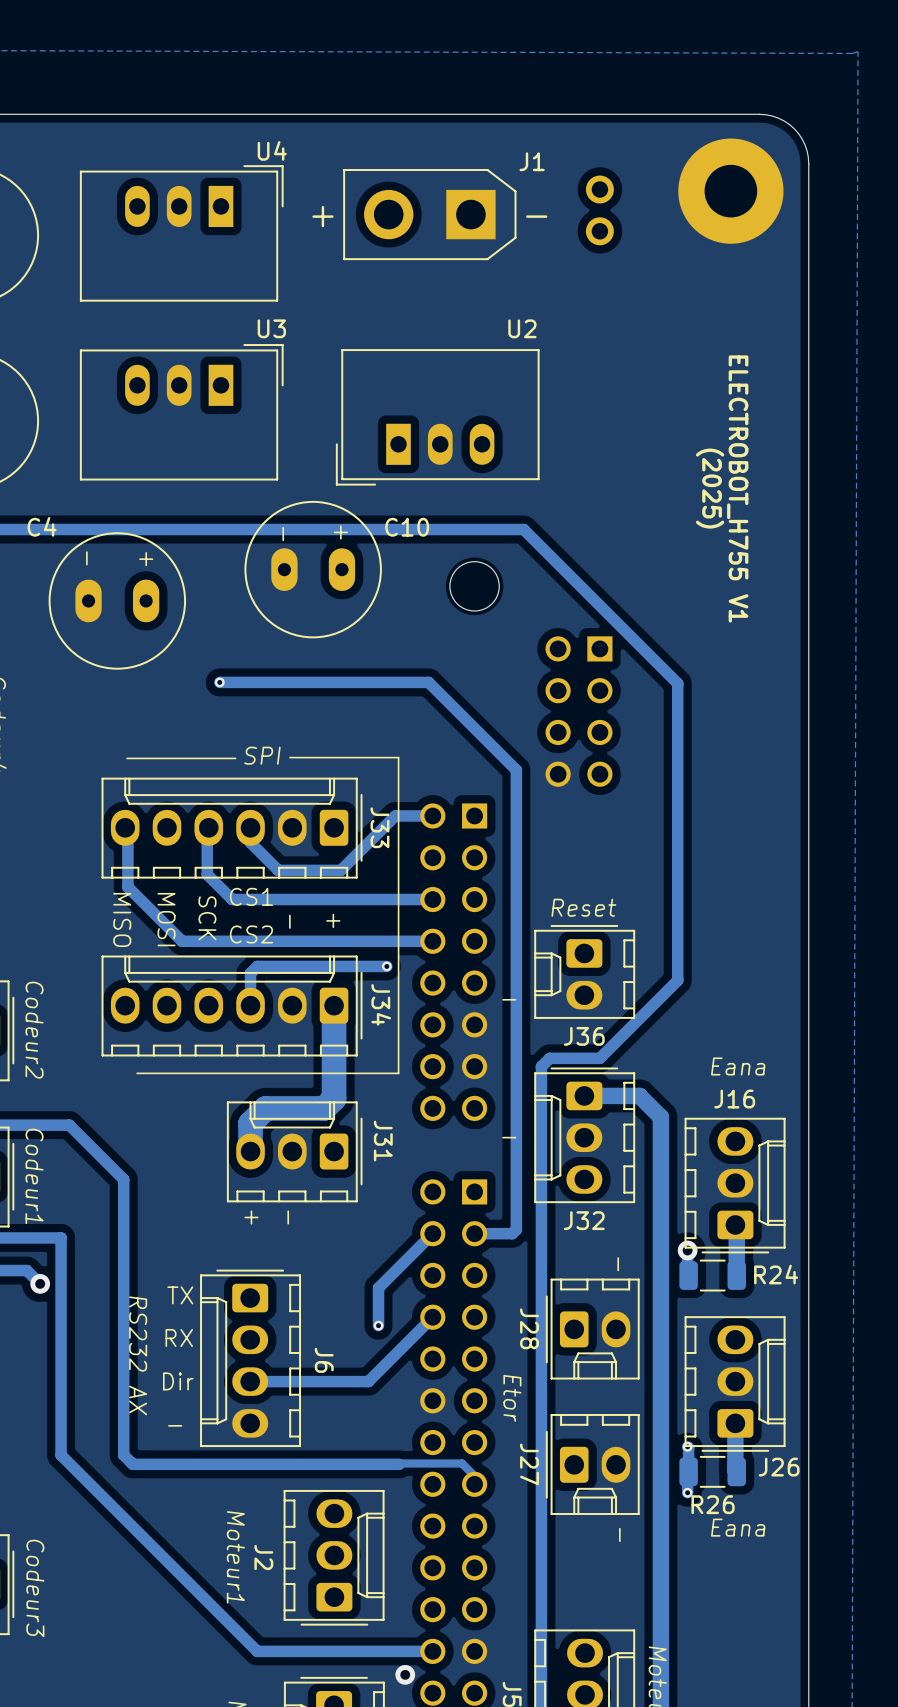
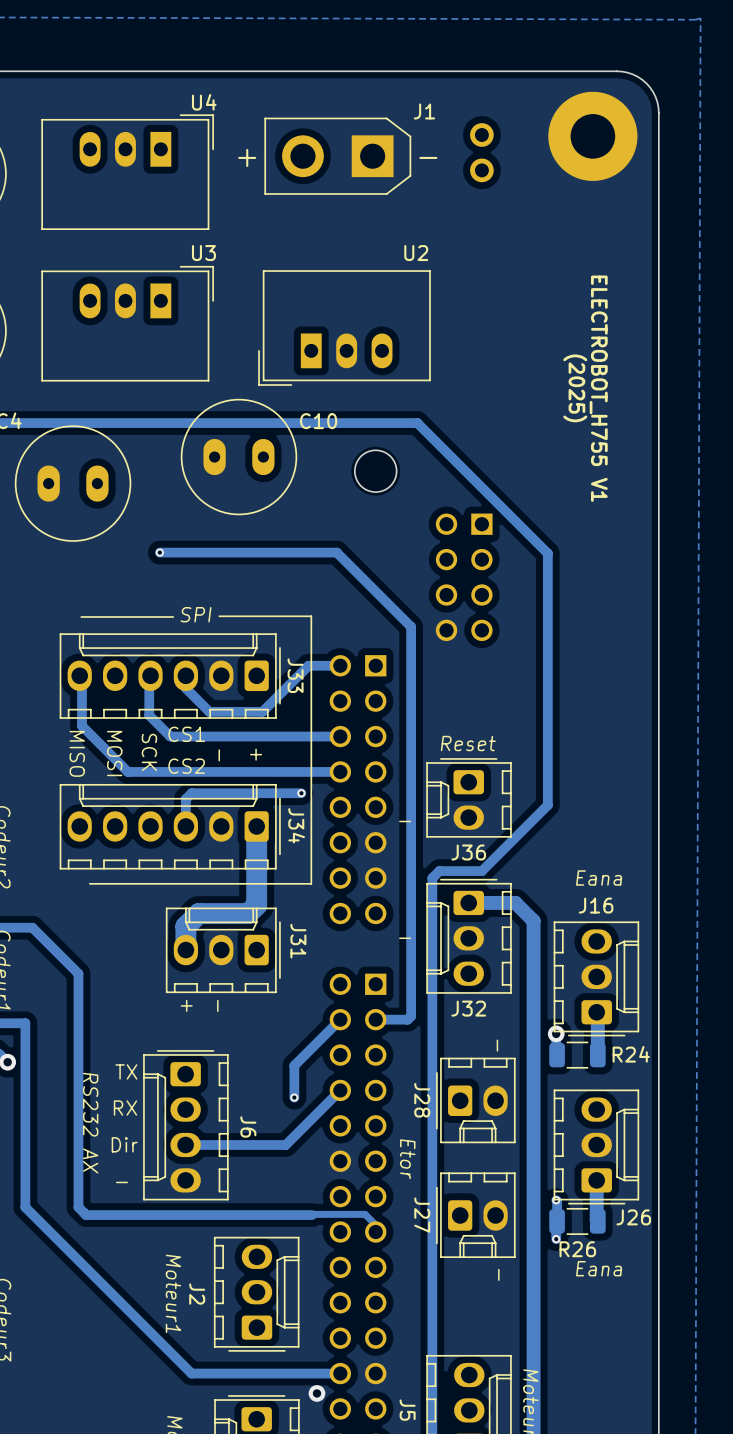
text: + (340, 532) -> none
text: - (283, 534) -> none
text: - (86, 558) -> none
text: + (146, 559) -> none

